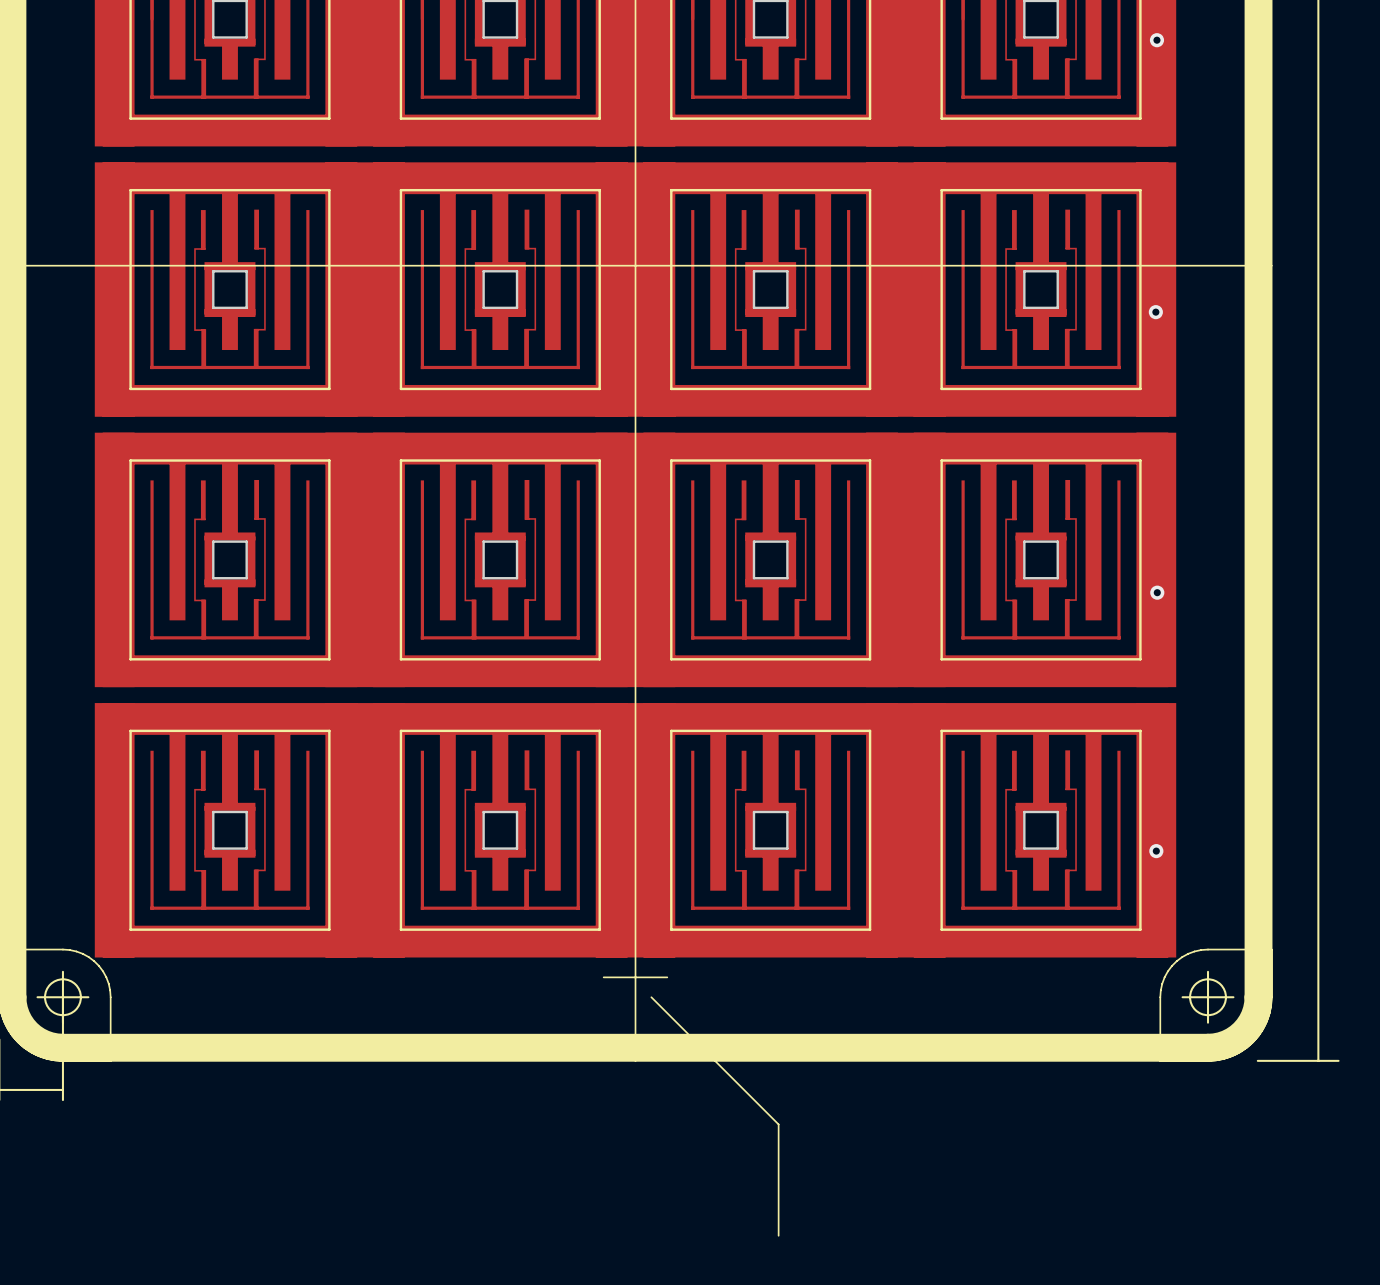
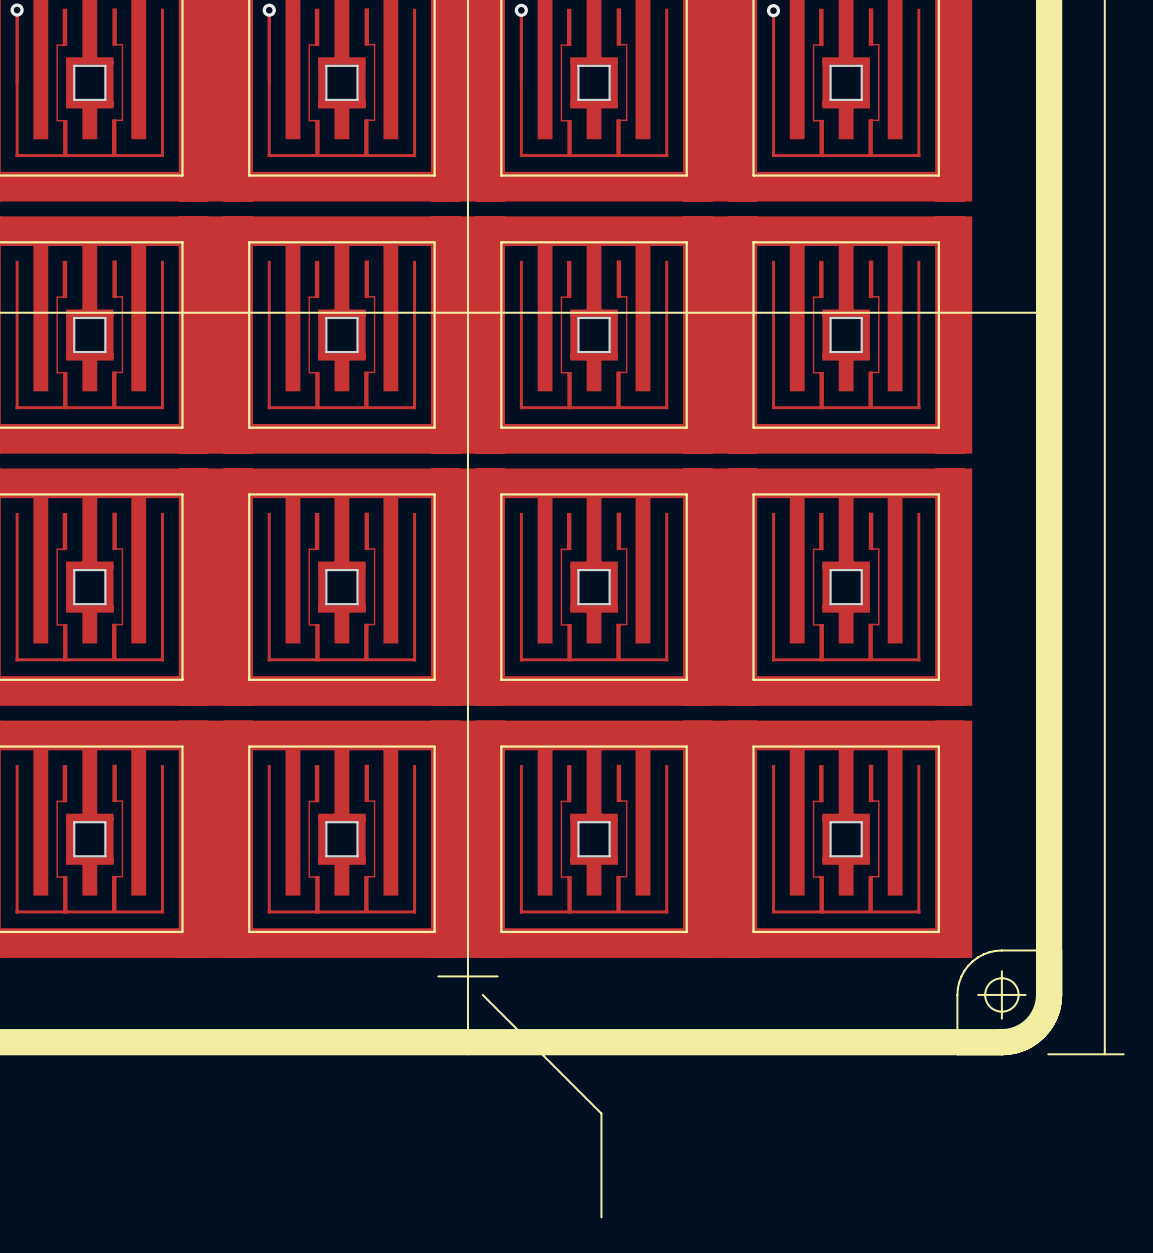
via: (1156, 40) -> none
via: (1155, 312) -> none
via: (1157, 592) -> none
via: (1156, 851) -> none

